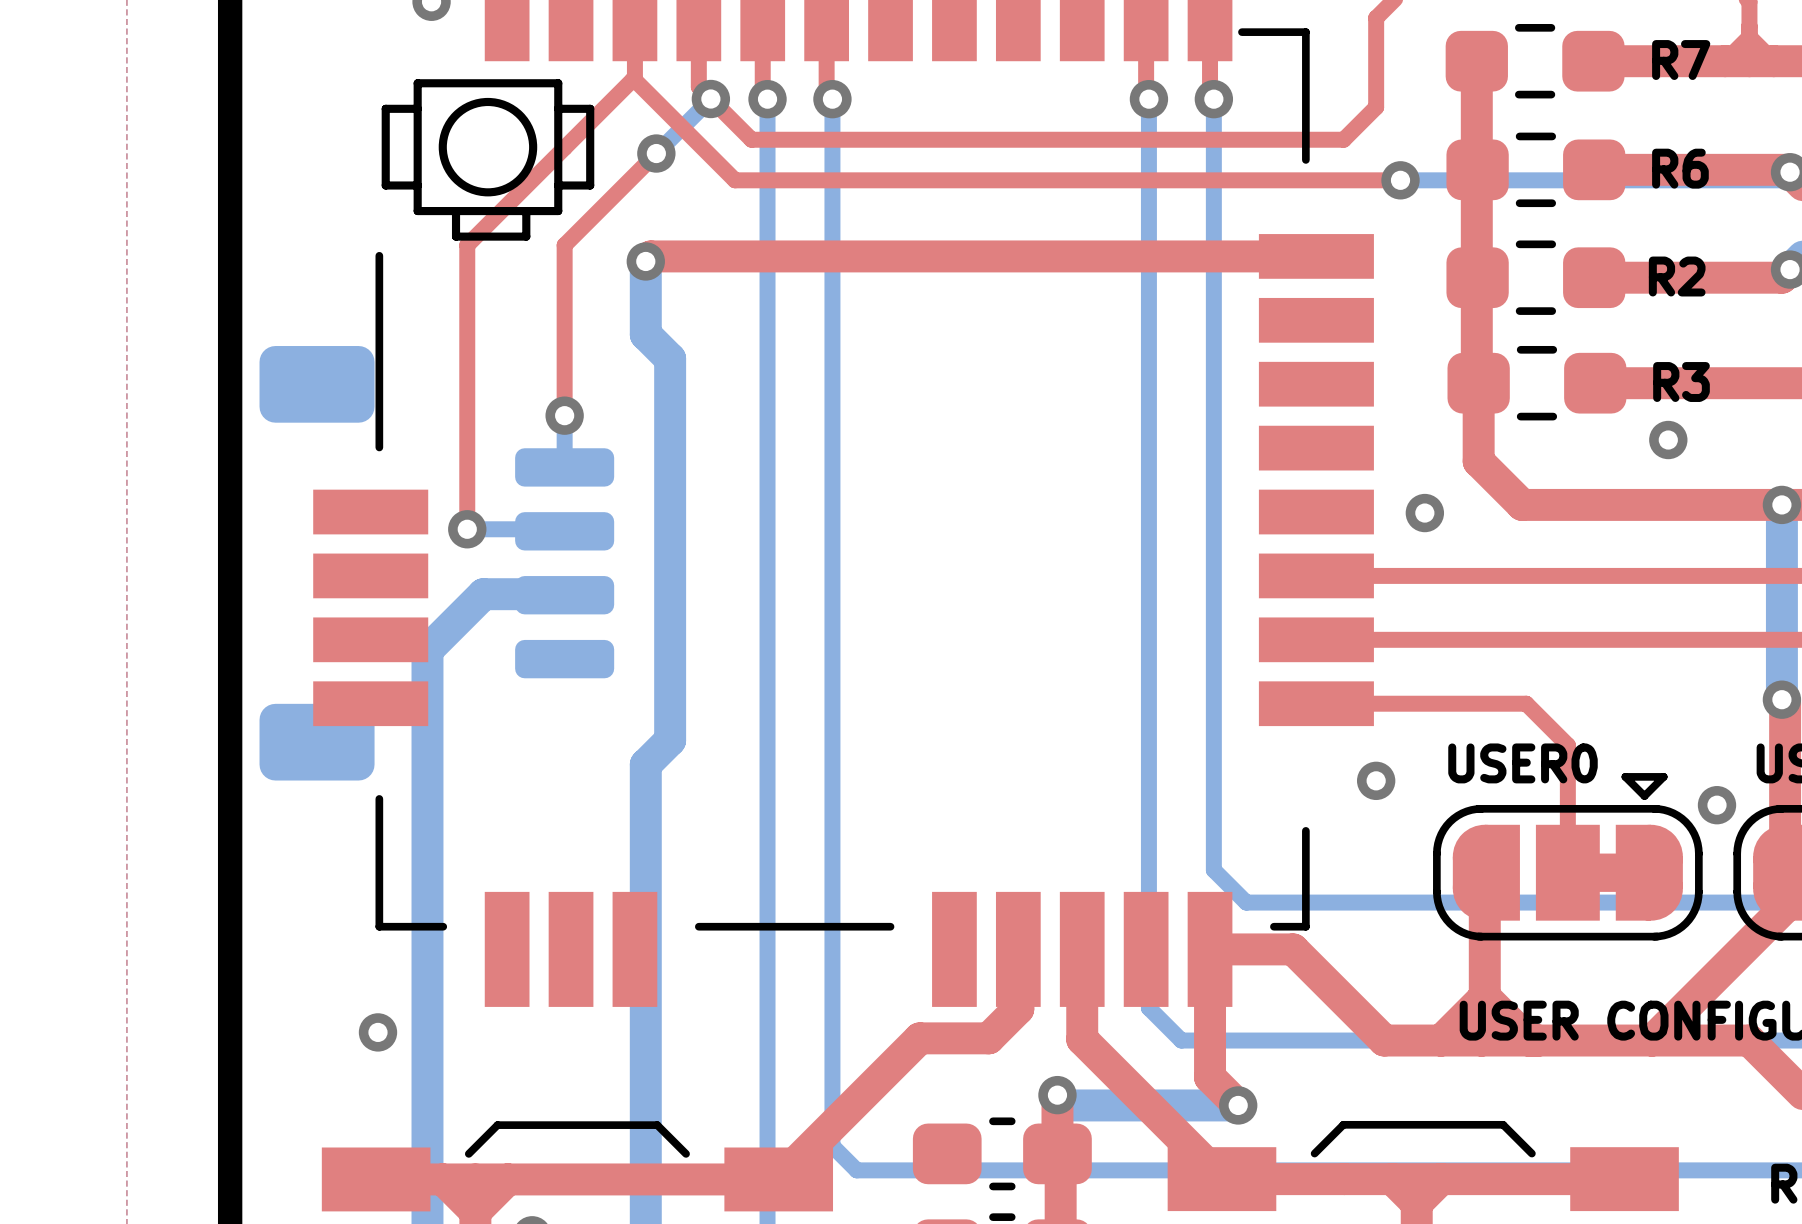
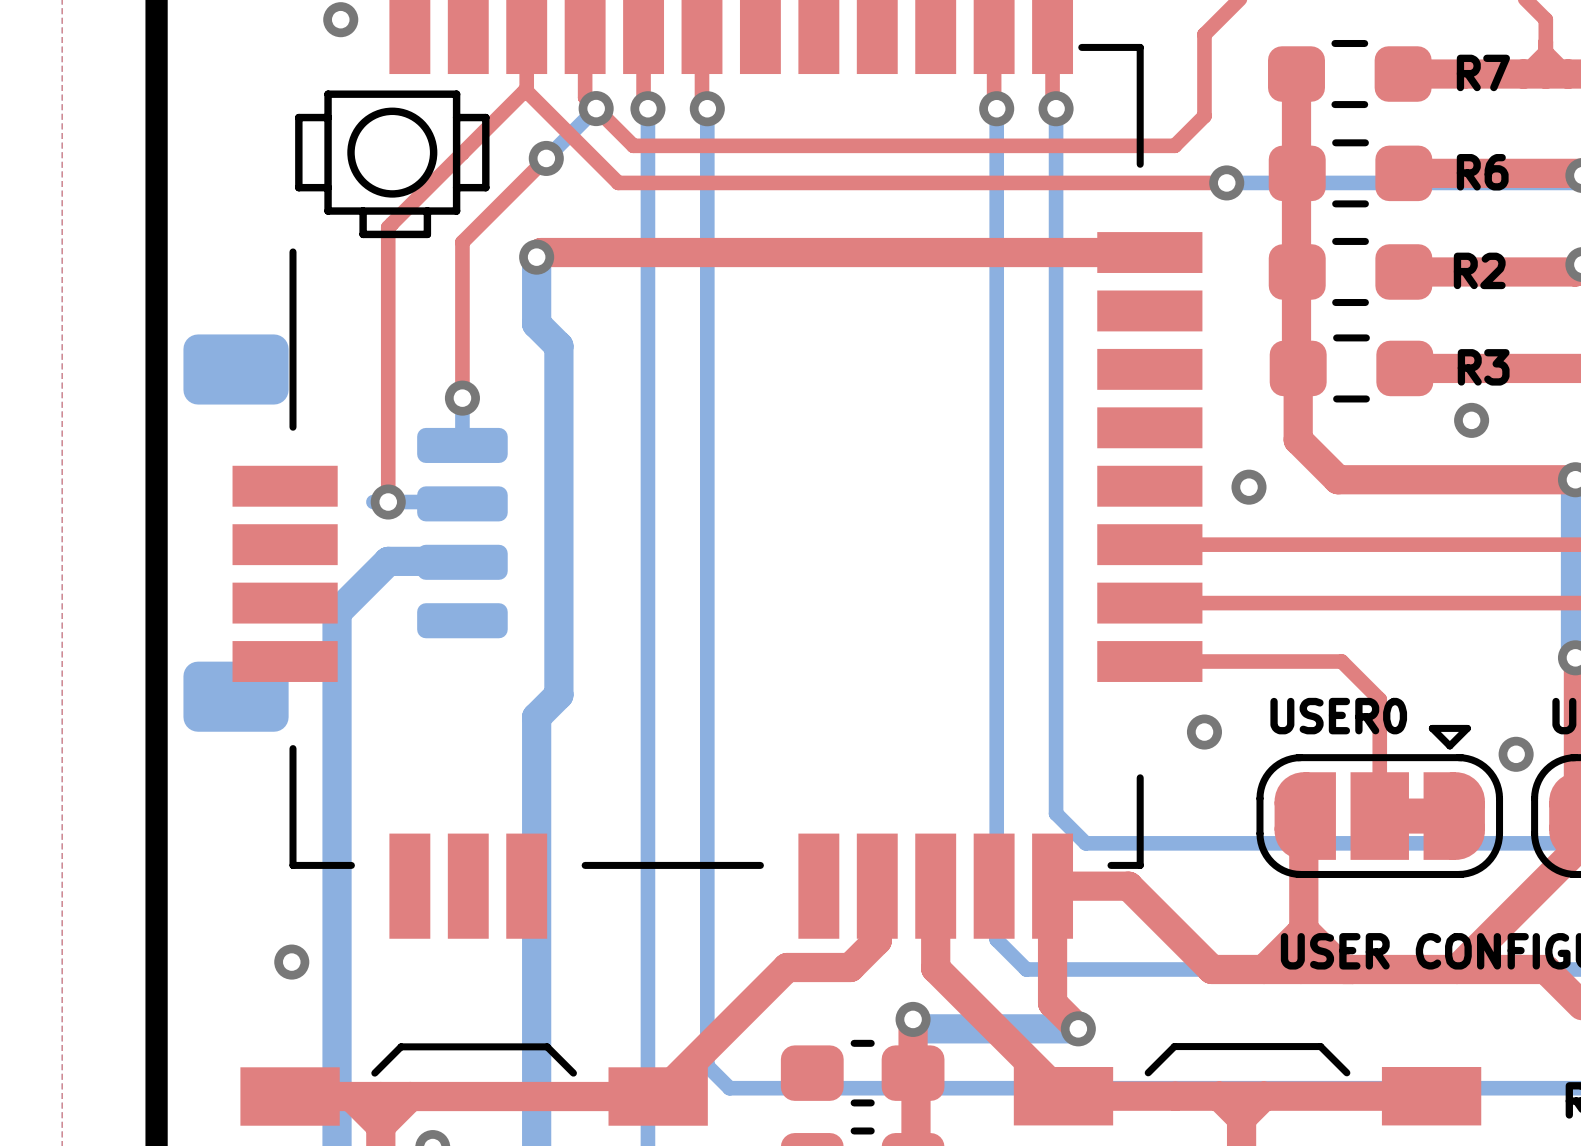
top track: (483, 229) (467, 245) (467, 529) -> (388, 227) (388, 502)
via position: (467, 529) -> (388, 502)

